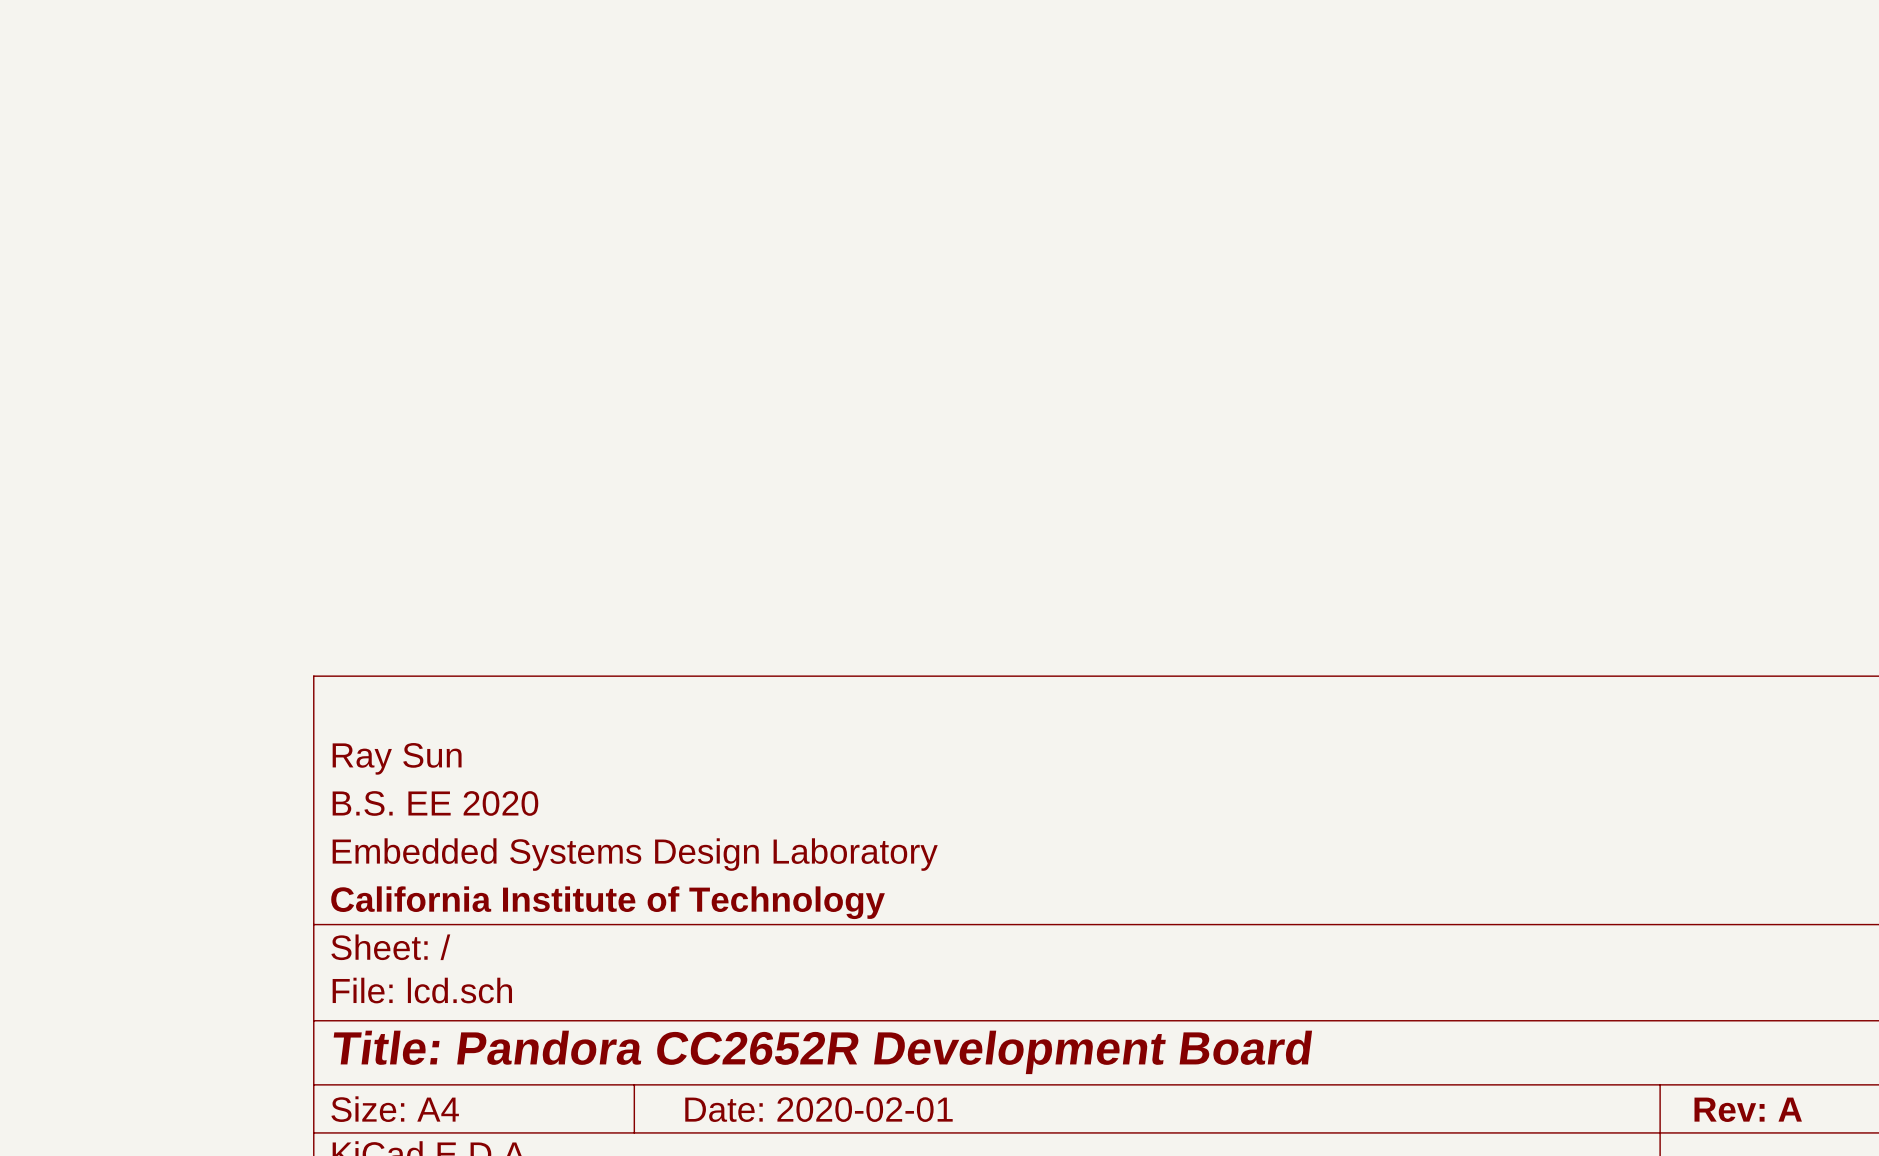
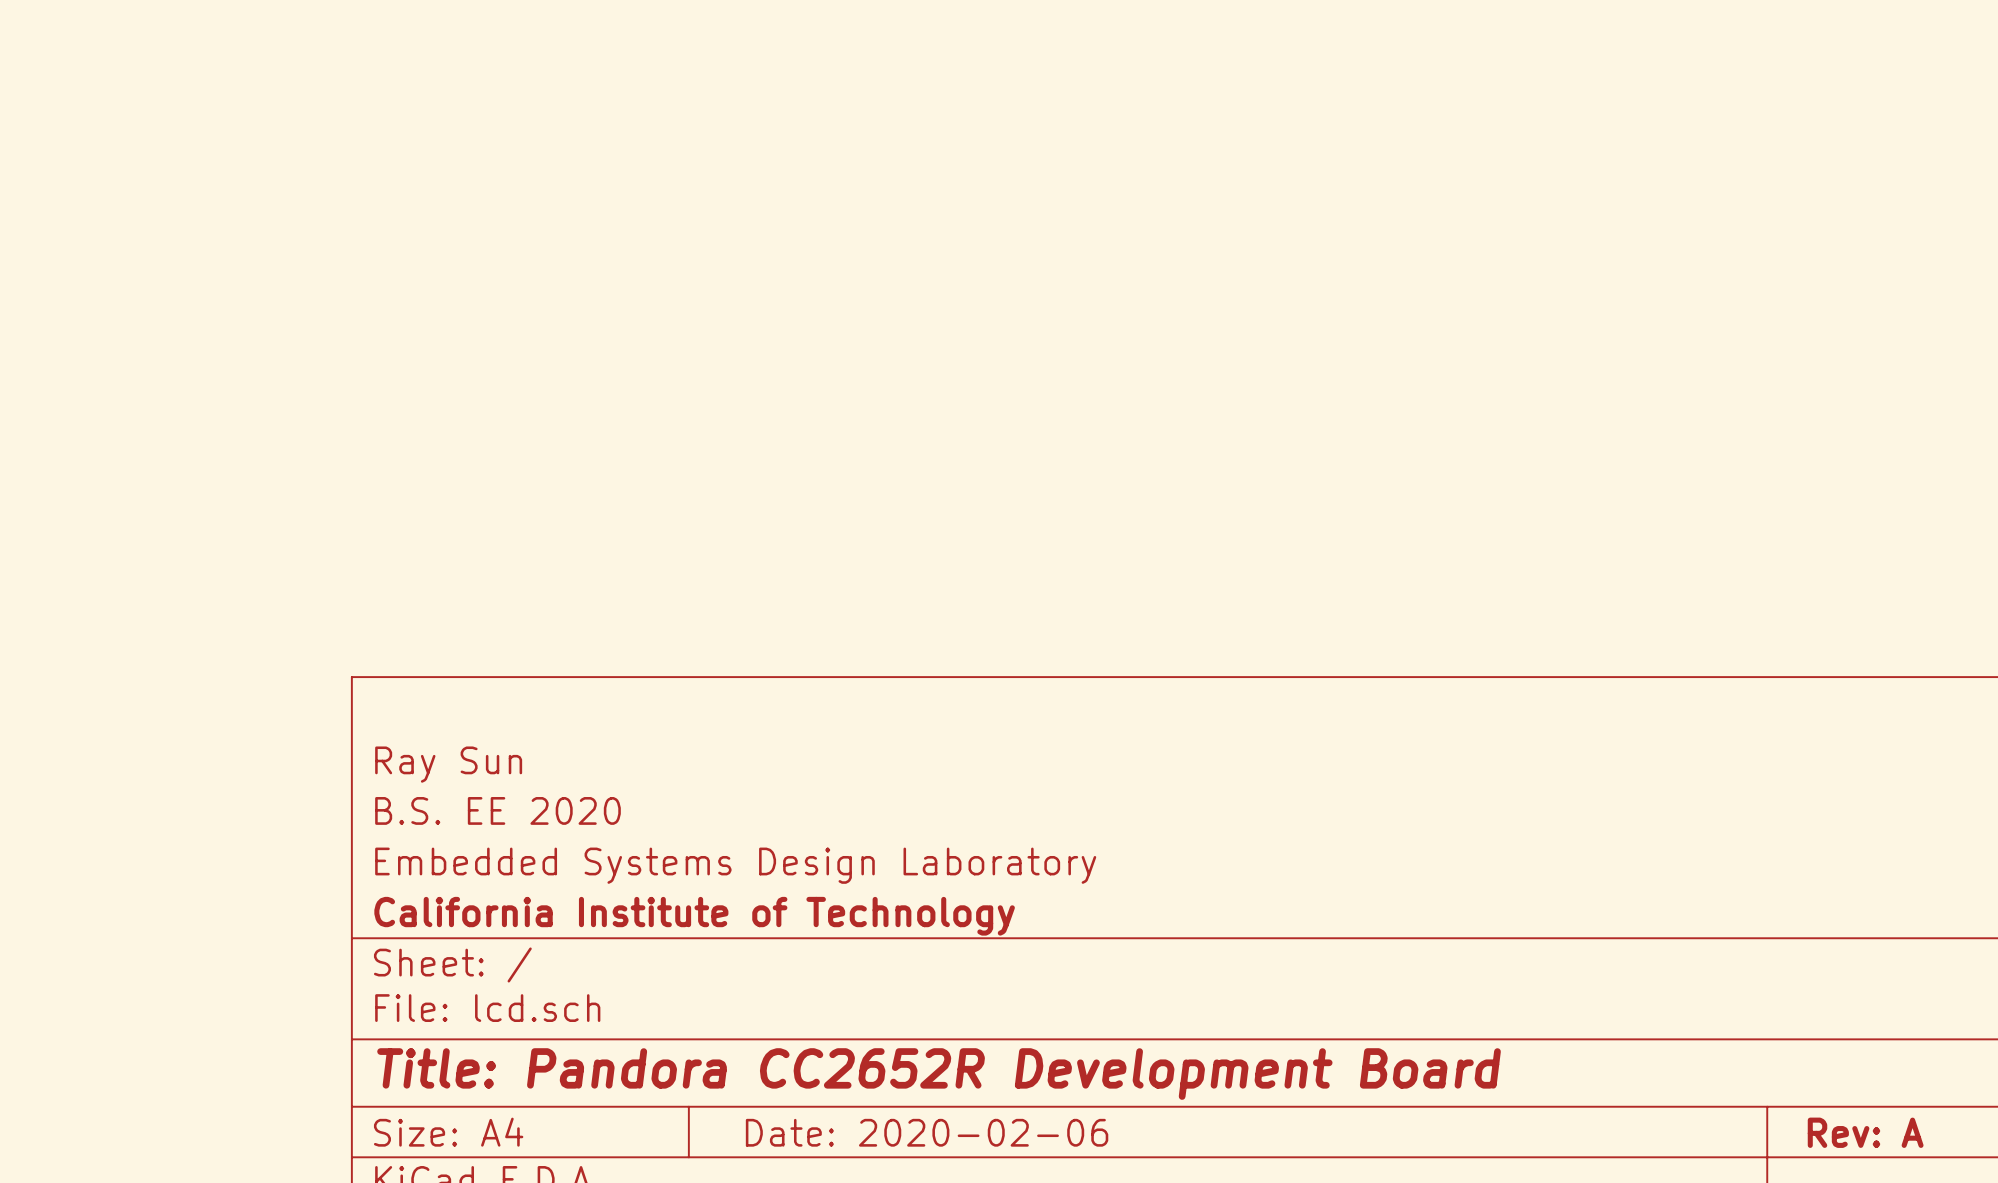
title block: Date: 2020-02-01 (818, 1109) -> Date: 2020-02-06 (927, 1132)

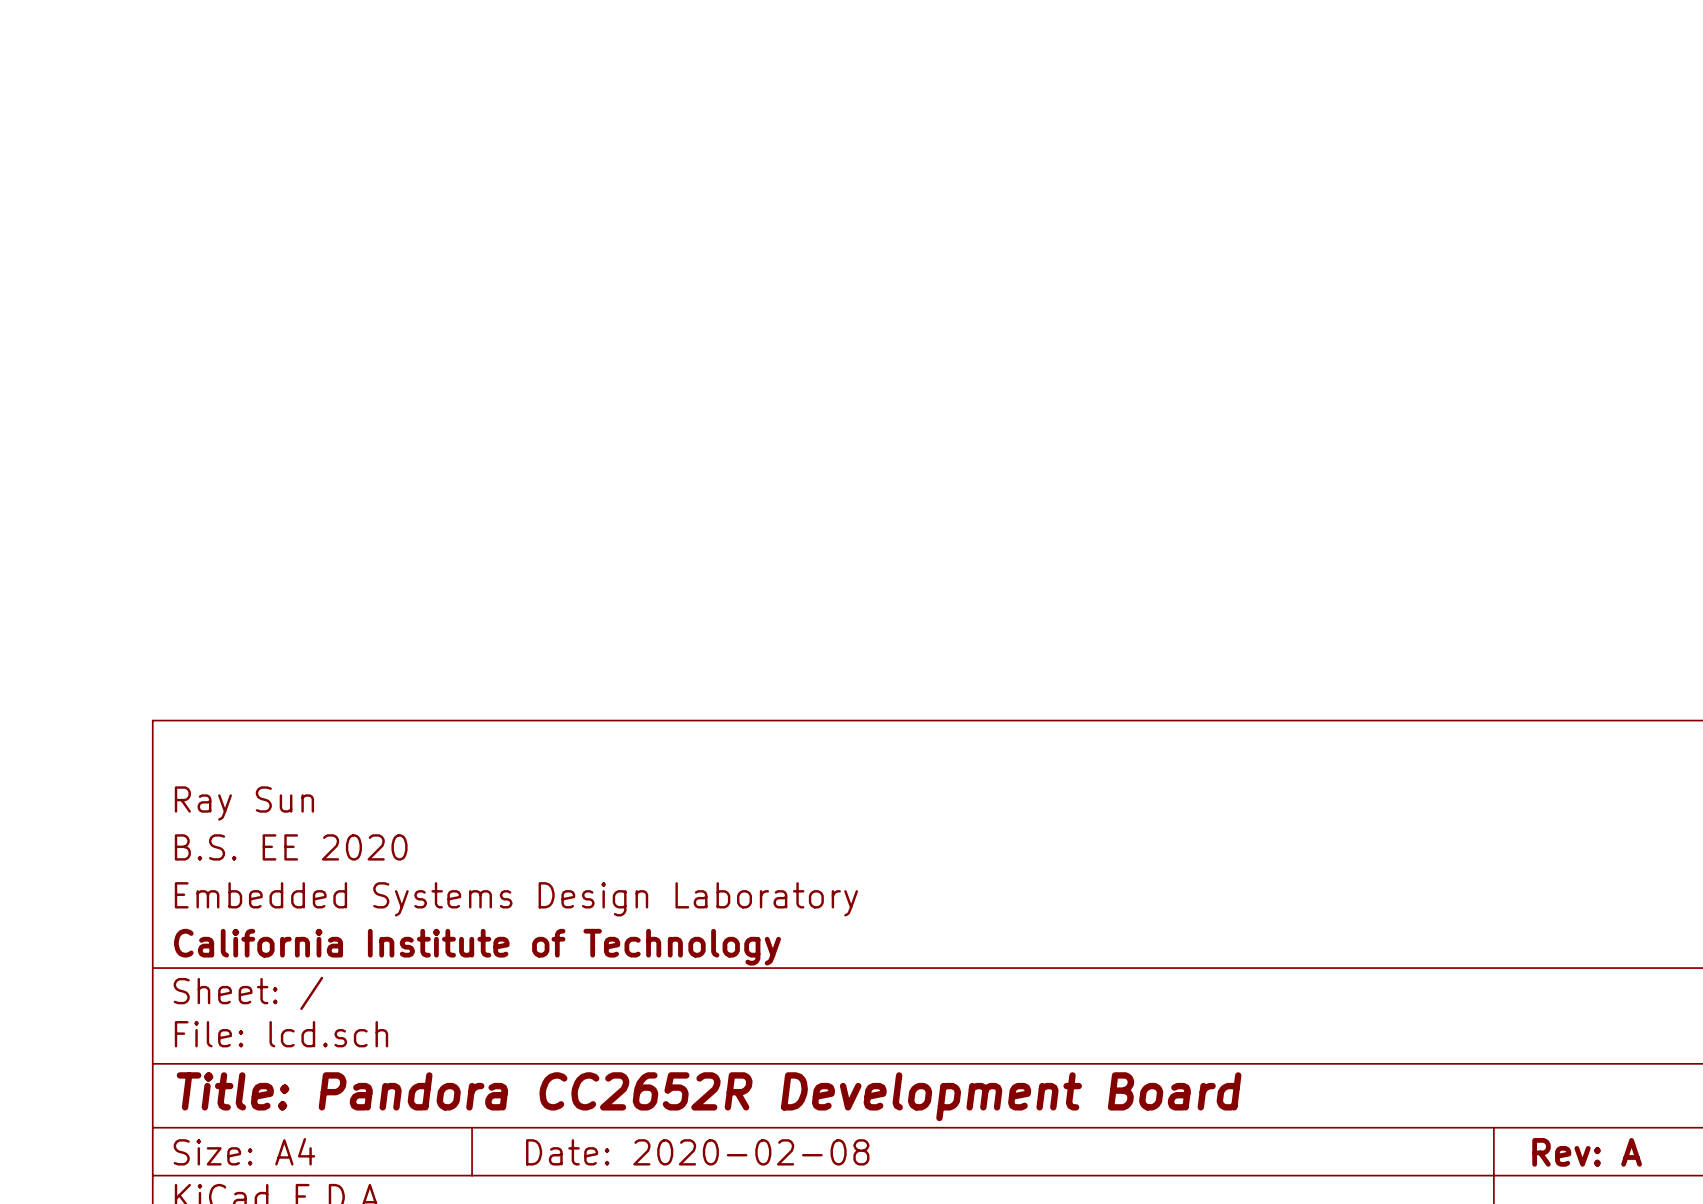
title block: Date: 2020-02-06 (927, 1132) -> Date: 2020-02-08 (697, 1152)

